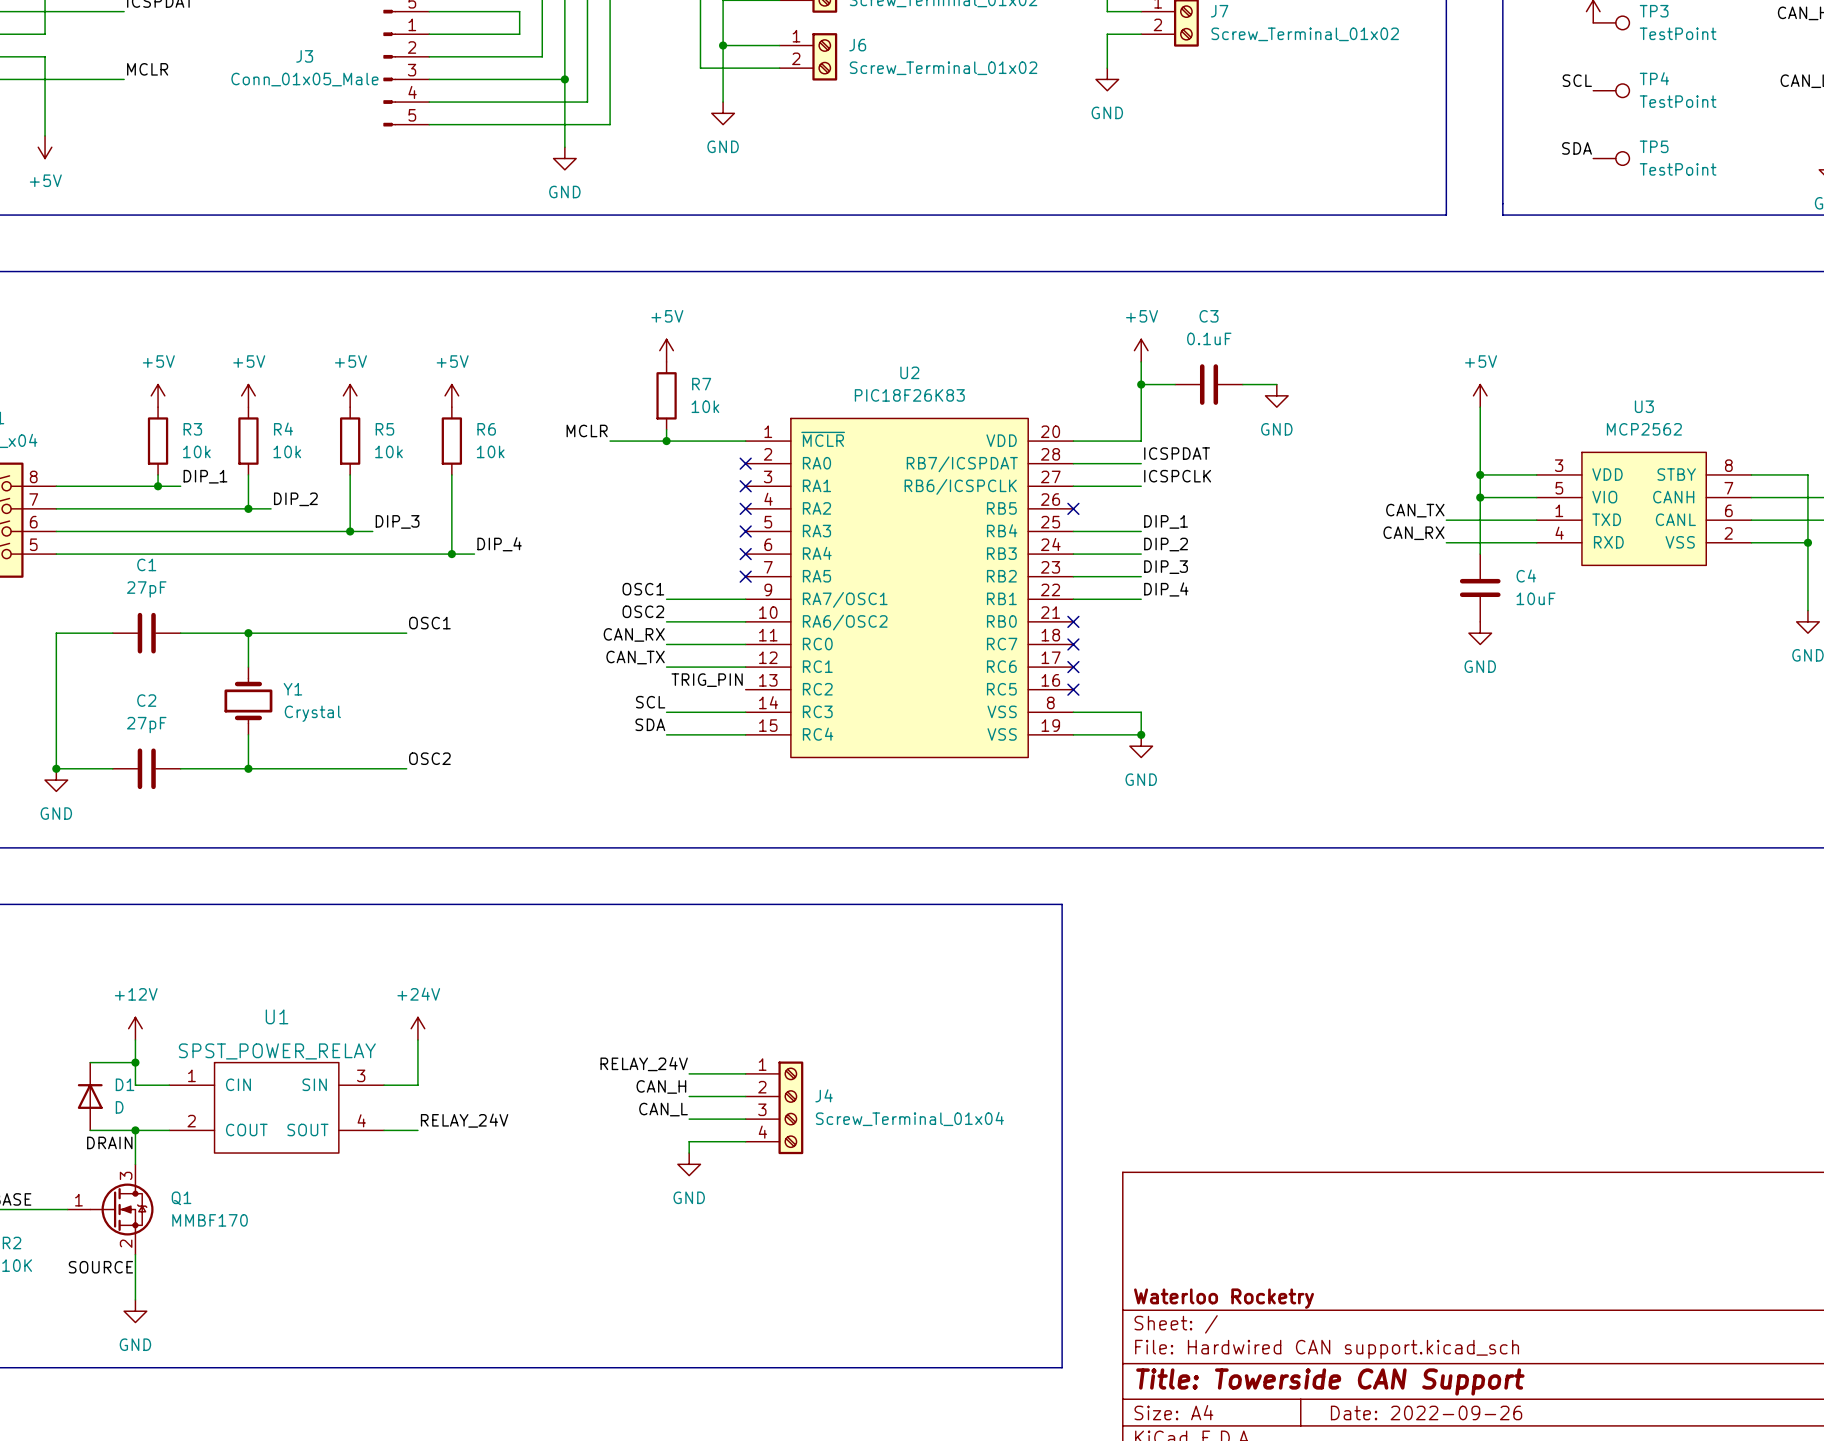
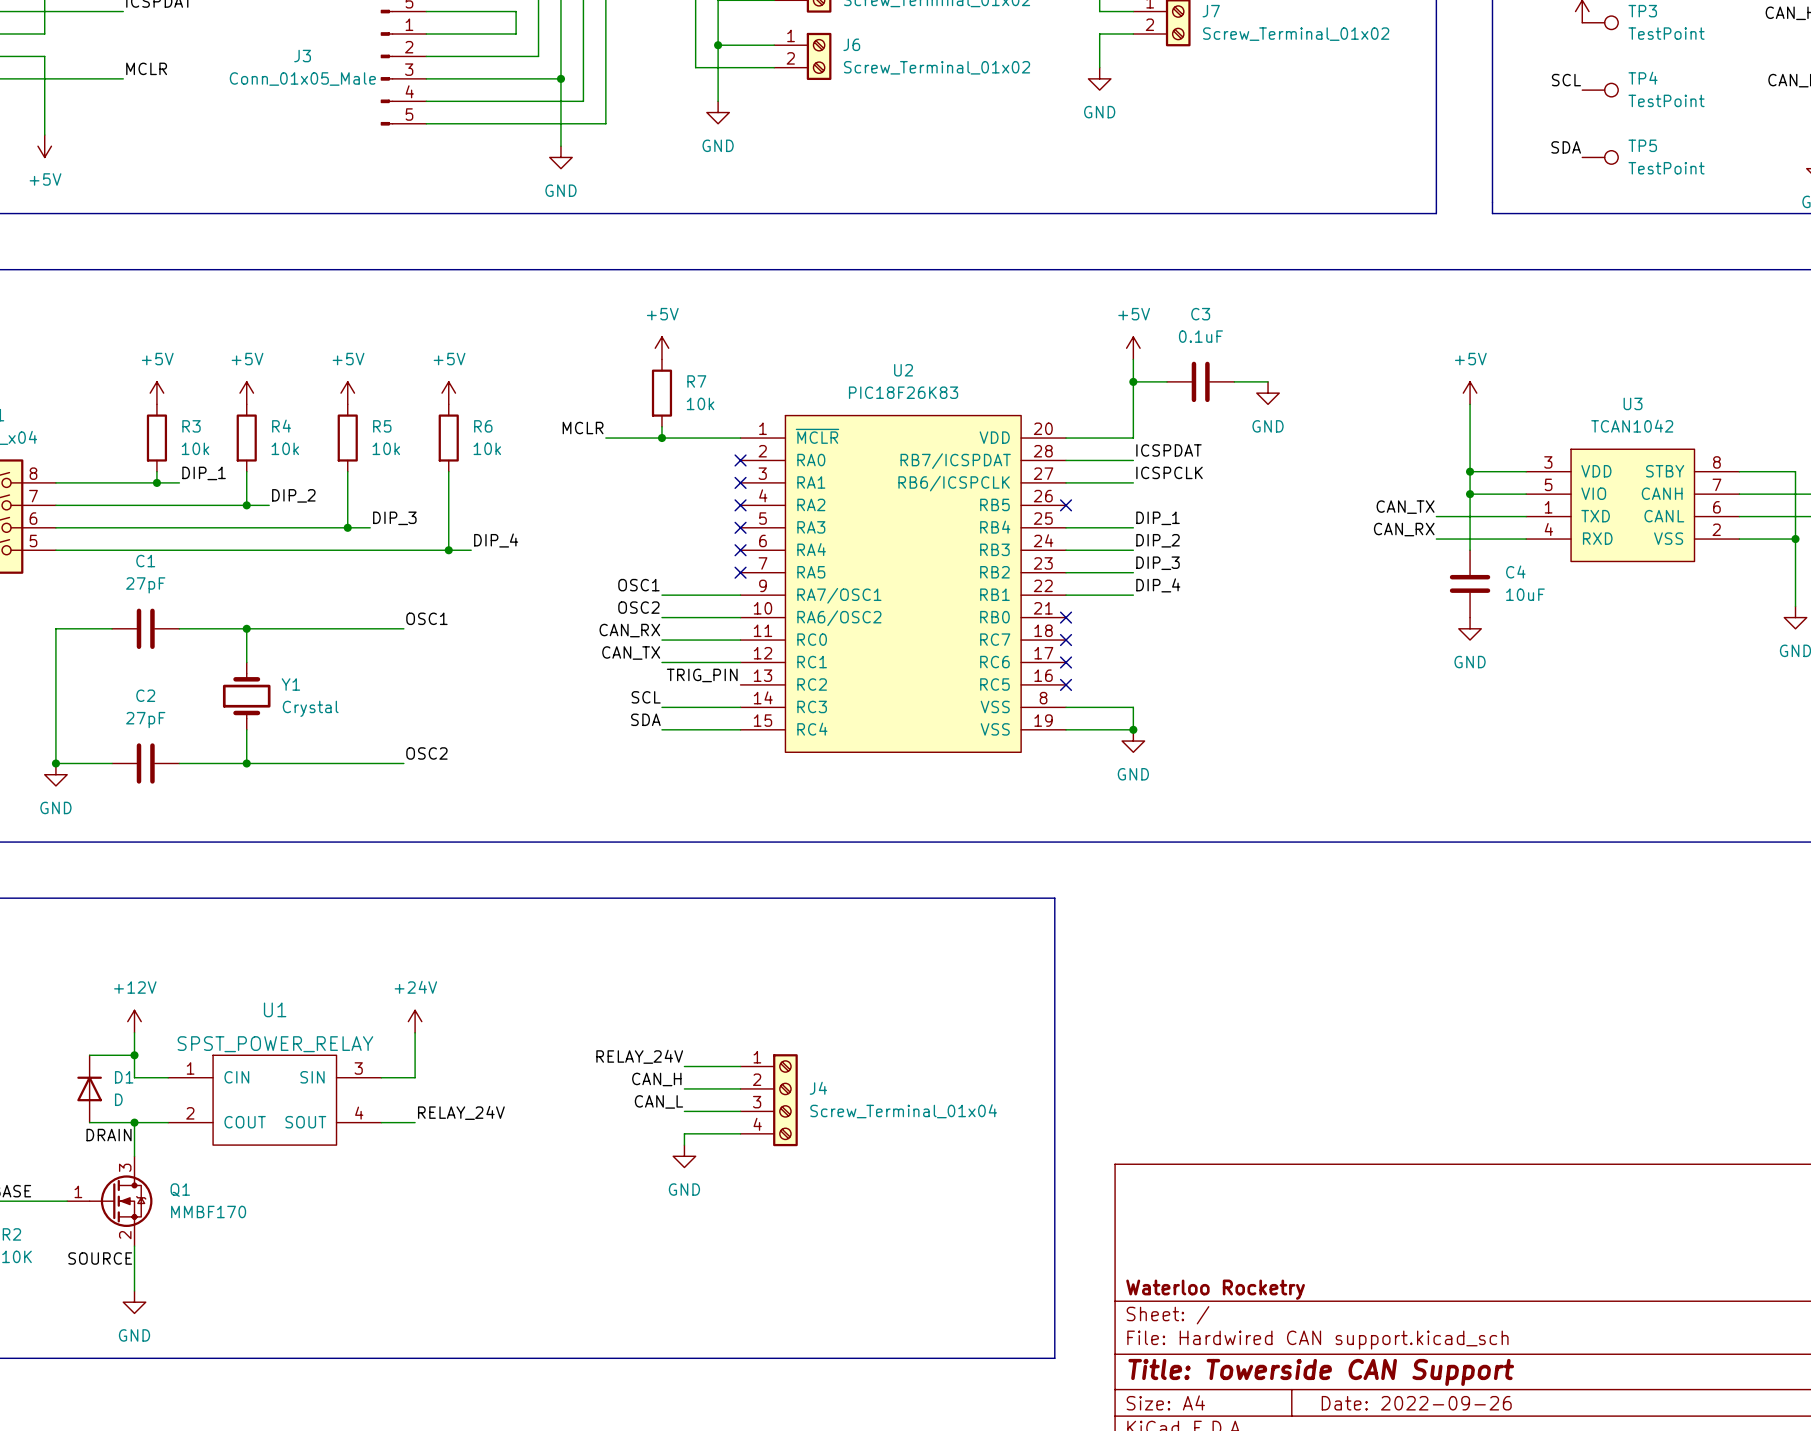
U3 value: MCP2562 (1644, 429) -> TCAN1042 (1632, 426)

